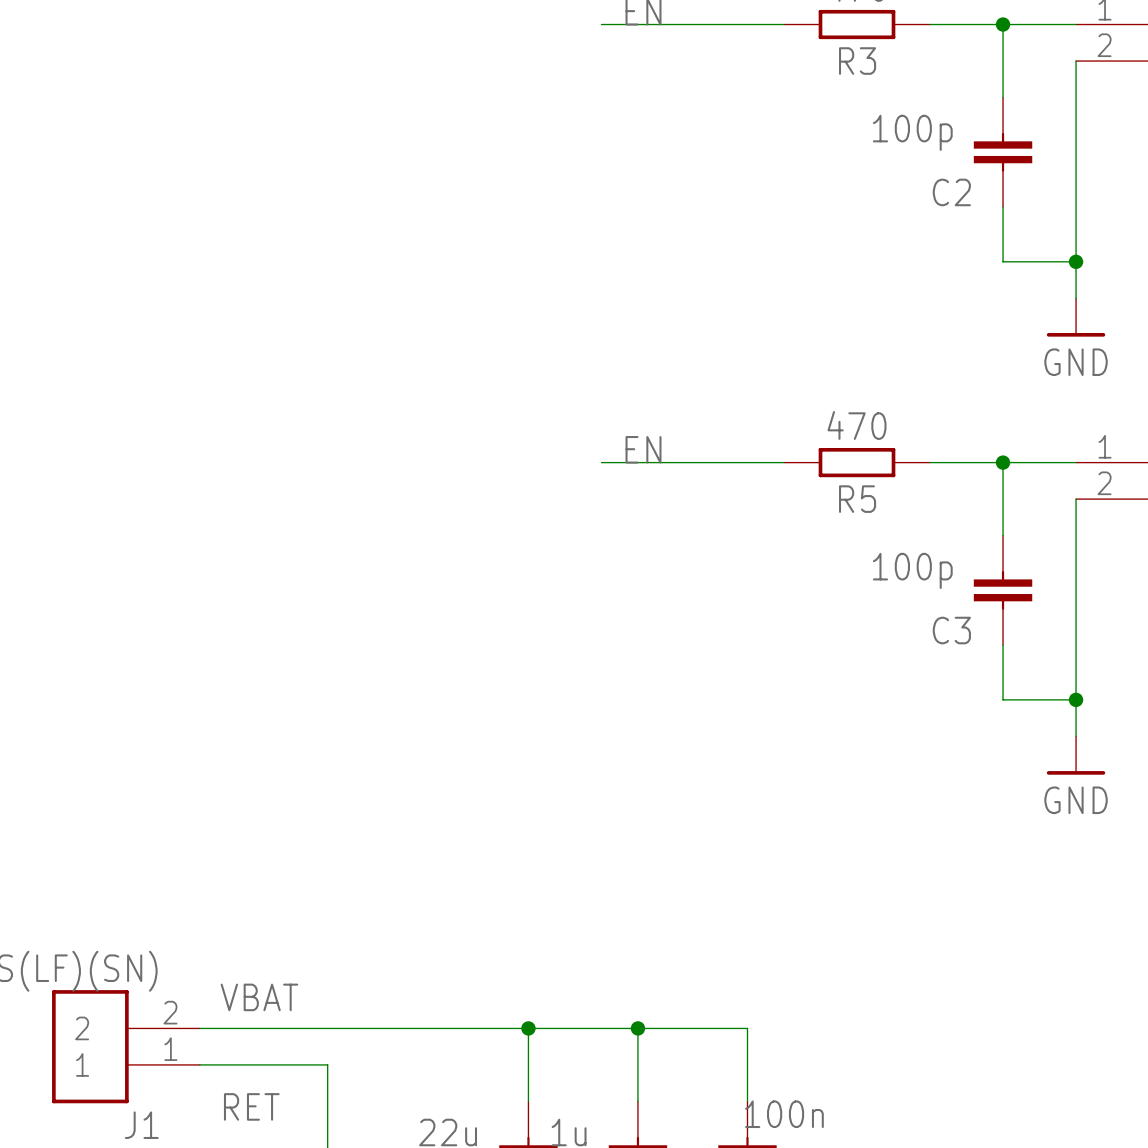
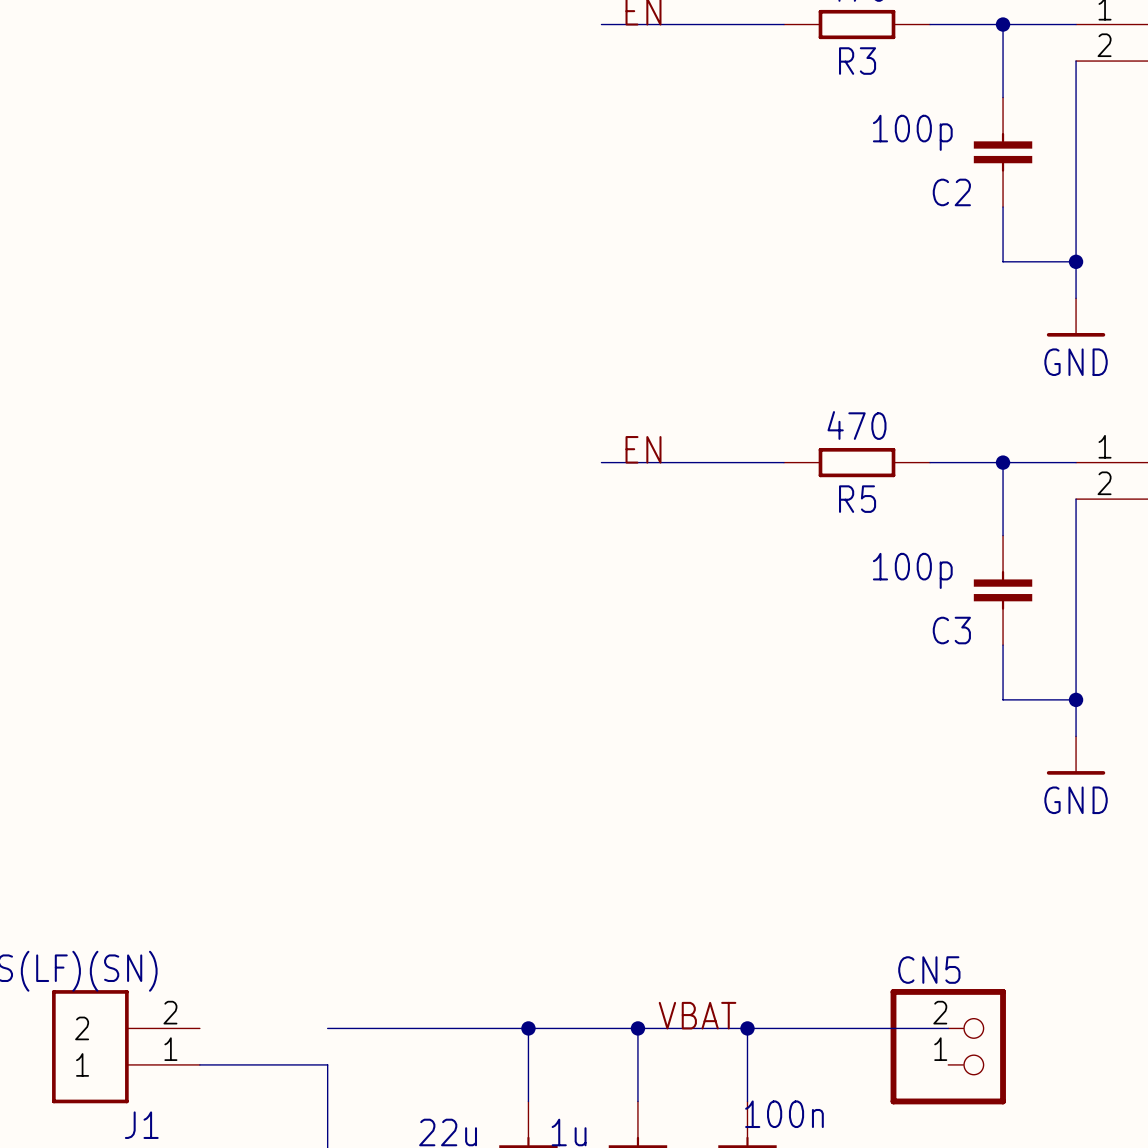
label: VBAT (259, 997) -> none
label: none -> VBAT (697, 1015)
wire: (199, 1028) (327, 1028) -> none
wire: none -> (747, 1028) (948, 1028)
junction: none -> (747, 1028)
CN5: none -> (948, 1046)
label: RET (251, 1106) -> none

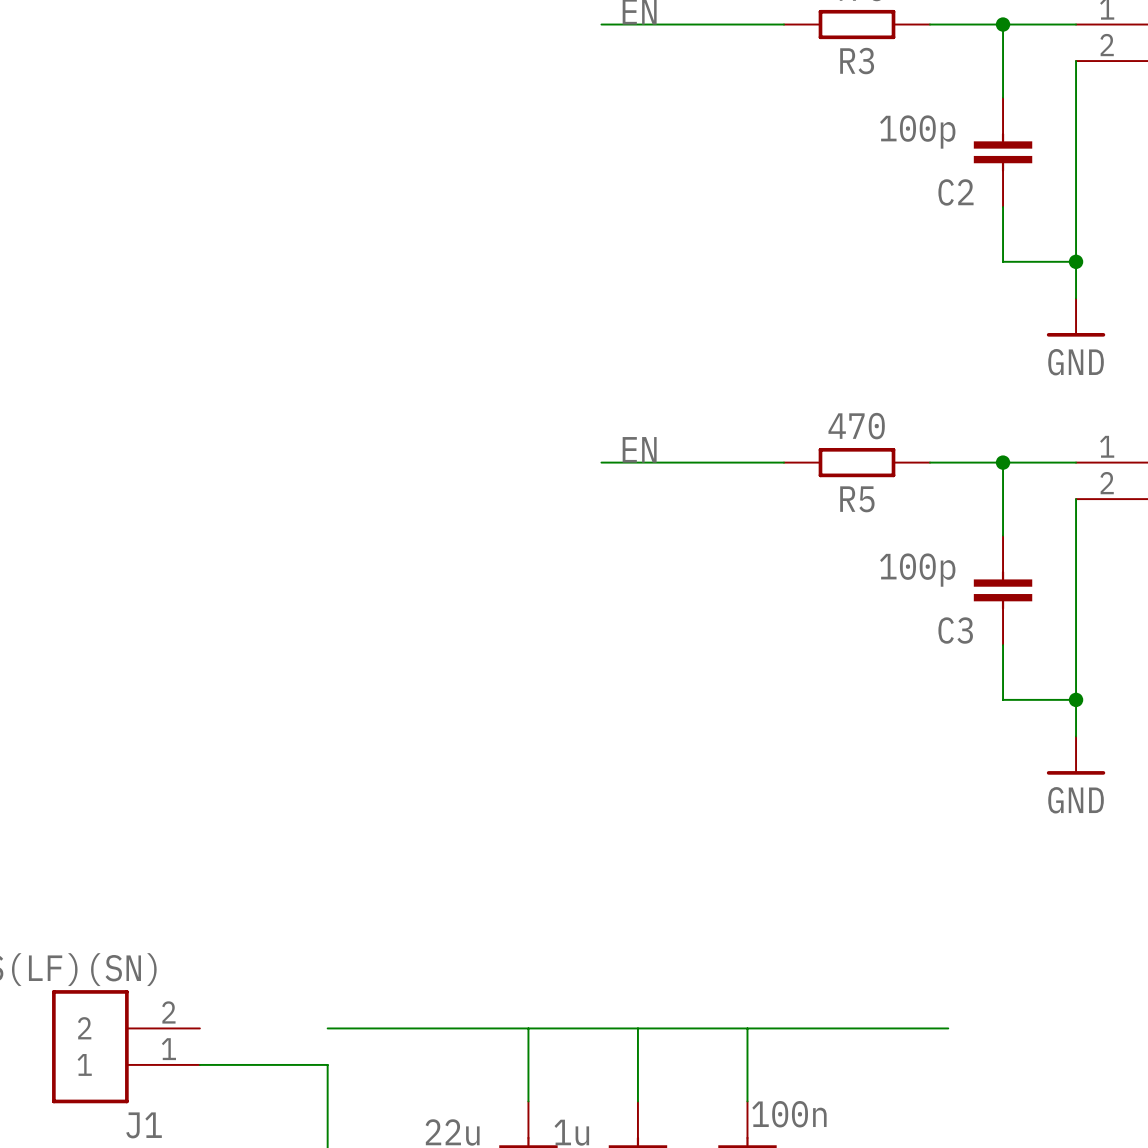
label: VBAT (697, 1015) -> none
junction: (528, 1028) -> none
junction: (637, 1028) -> none
junction: (747, 1028) -> none
CN5: (948, 1046) -> none

